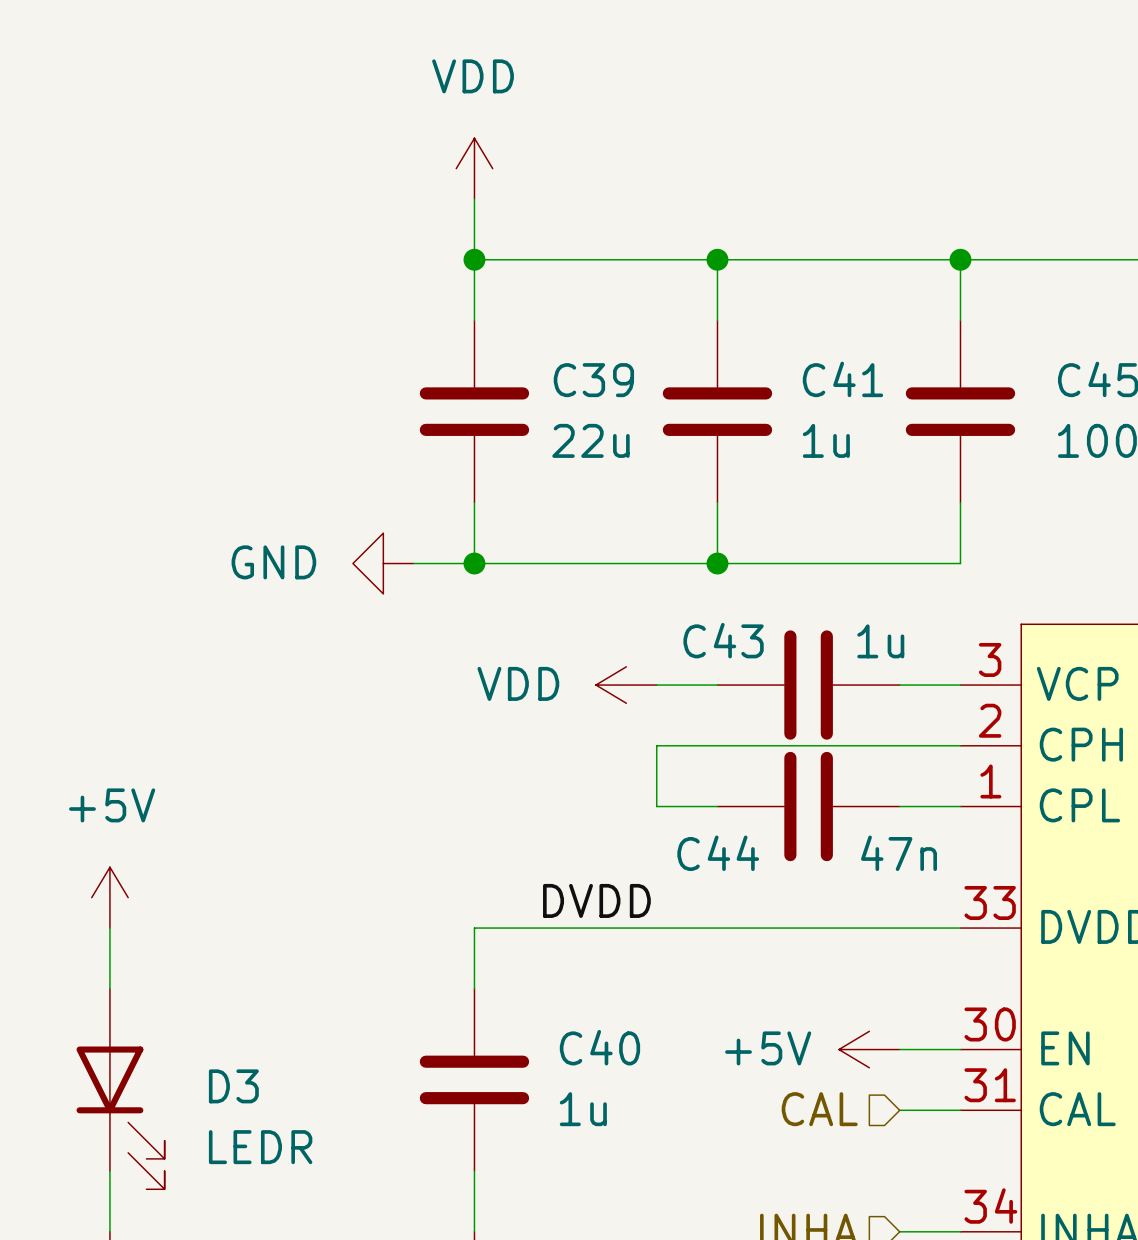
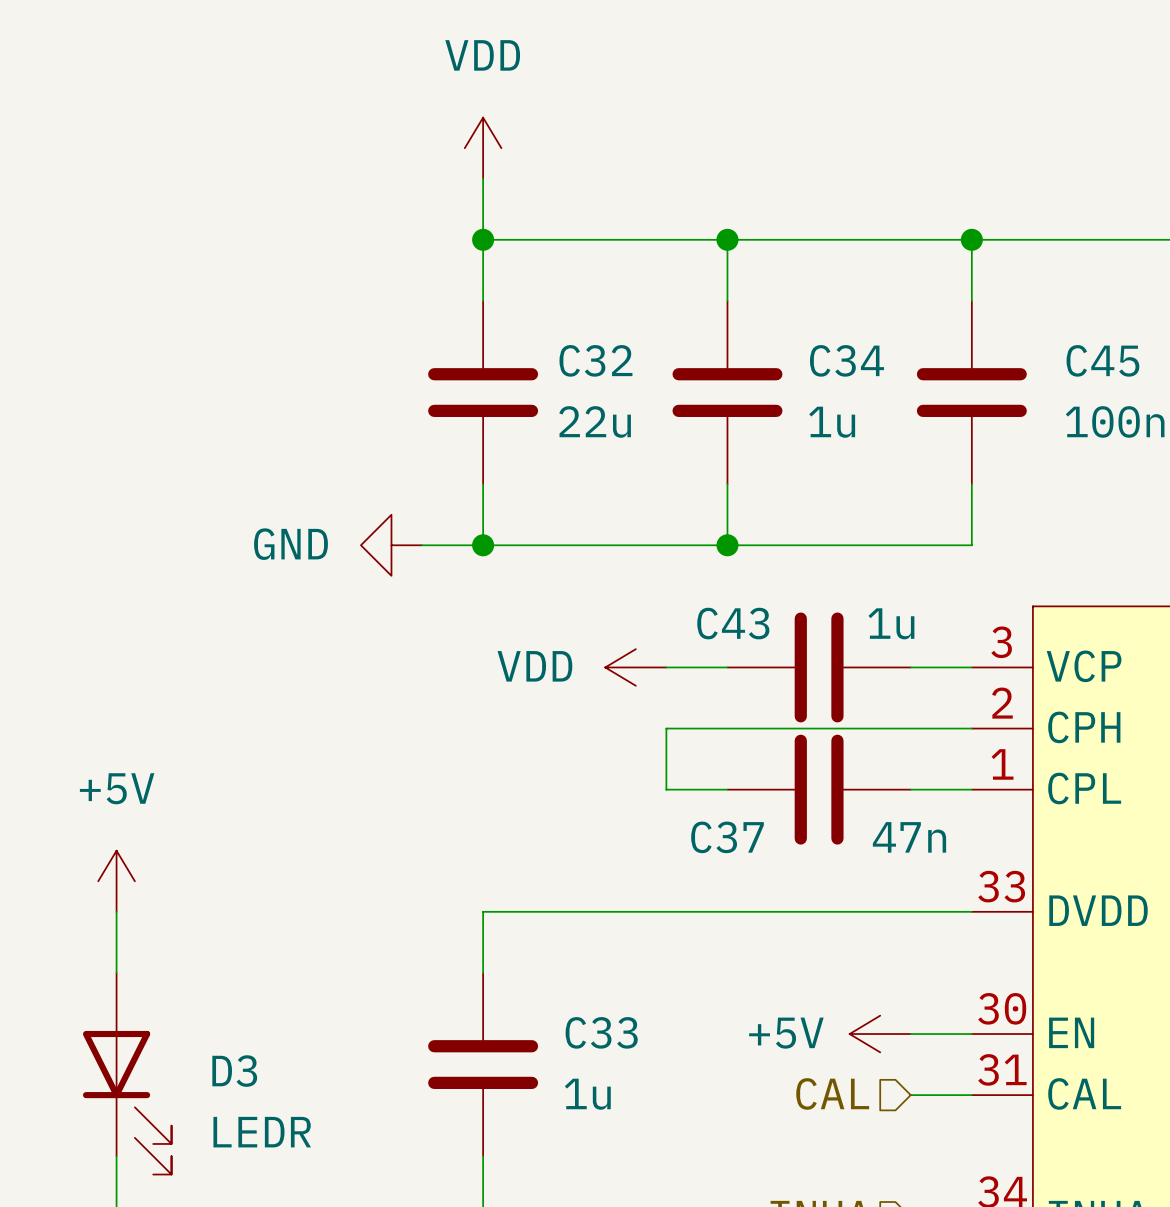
C41 name: C41 (842, 379) -> C34 (846, 360)
C39 name: C39 (593, 380) -> C32 (595, 360)
C44 name: C44 (718, 853) -> C37 (727, 837)
label: DVDD (596, 900) -> none
C40 name: C40 (599, 1047) -> C33 (601, 1032)

